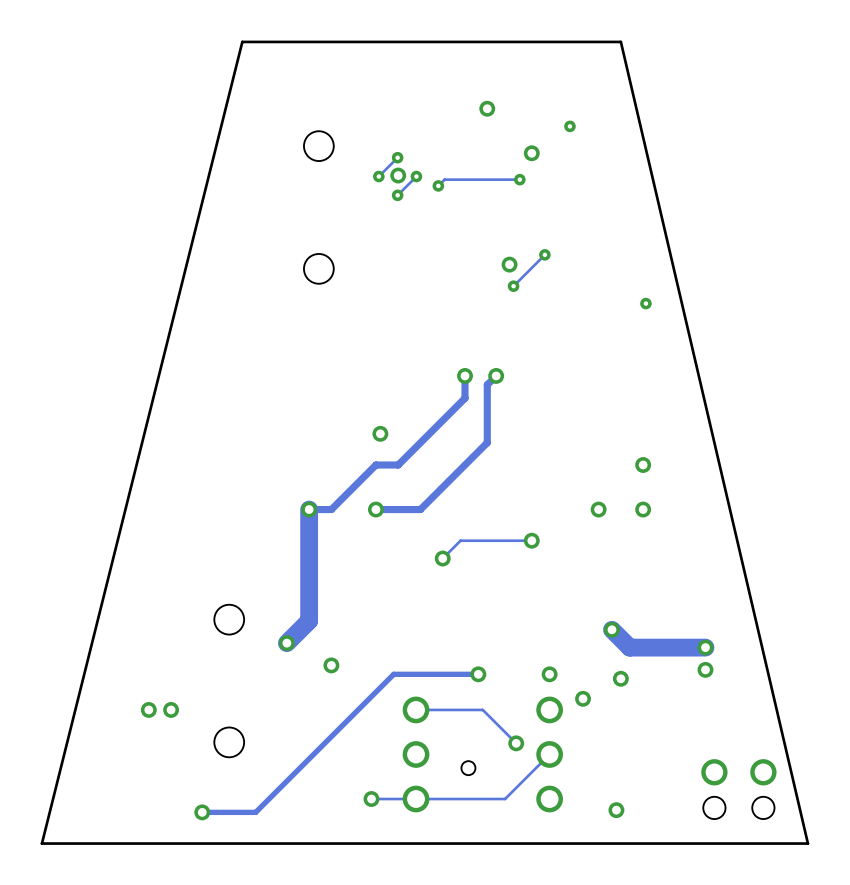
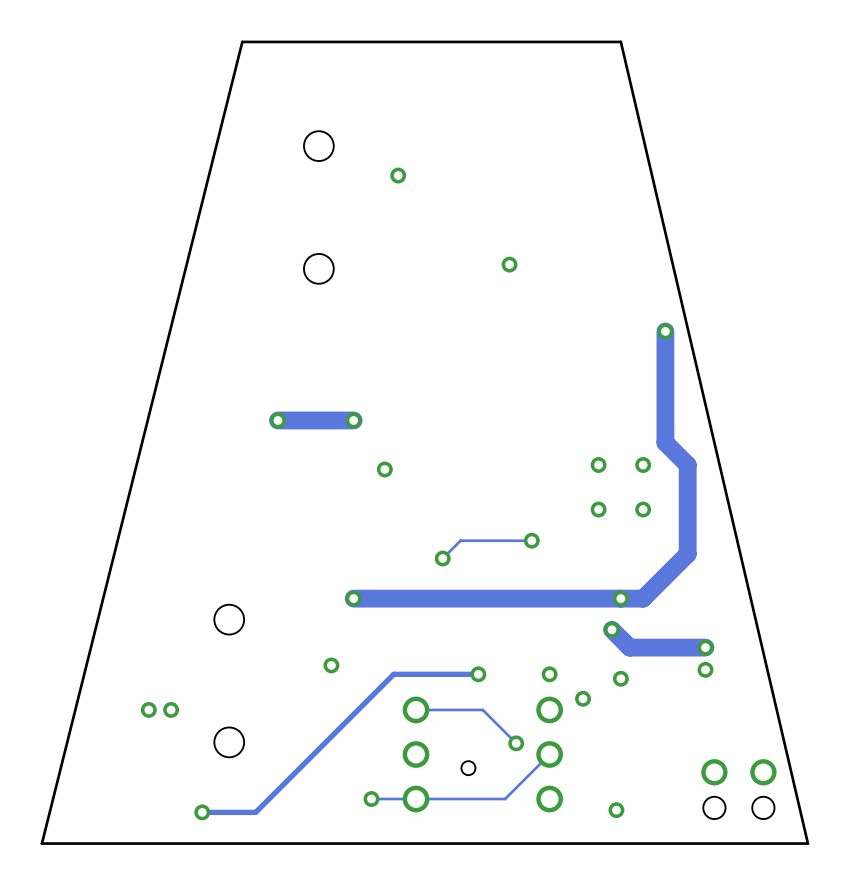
via: (487, 108) -> none
via: (569, 126) -> none
via: (531, 153) -> none
track: (397, 157) (378, 176) -> none
via: (397, 157) -> none
via: (378, 176) -> none
track: (416, 176) (397, 195) -> none
via: (416, 176) -> none
track: (519, 179) (444, 179) (438, 185) -> none
via: (519, 179) -> none
via: (438, 185) -> none
via: (397, 195) -> none
track: (544, 254) (513, 286) -> none
via: (544, 254) -> none
via: (513, 286) -> none
via: (645, 303) -> none
track: none -> (665, 331) (665, 442) (687, 465) (687, 554) (643, 598) (353, 598)
via: none -> (665, 331)
track: (465, 375) (465, 398) (398, 465) (375, 465) (331, 509) (309, 509) (309, 620) (286, 643) -> none
via: (465, 375) -> none
track: (496, 375) (487, 384) (487, 442) (420, 509) (375, 509) -> none
via: (496, 375) -> none
via: none -> (277, 420)
track: none -> (353, 420) (277, 420)
via: none -> (353, 420)
via: (380, 433) -> none
via: none -> (598, 465)
via: none -> (384, 469)
via: (309, 509) -> none
via: (375, 509) -> none
via: none -> (353, 598)
via: none -> (620, 598)
via: (286, 643) -> none

